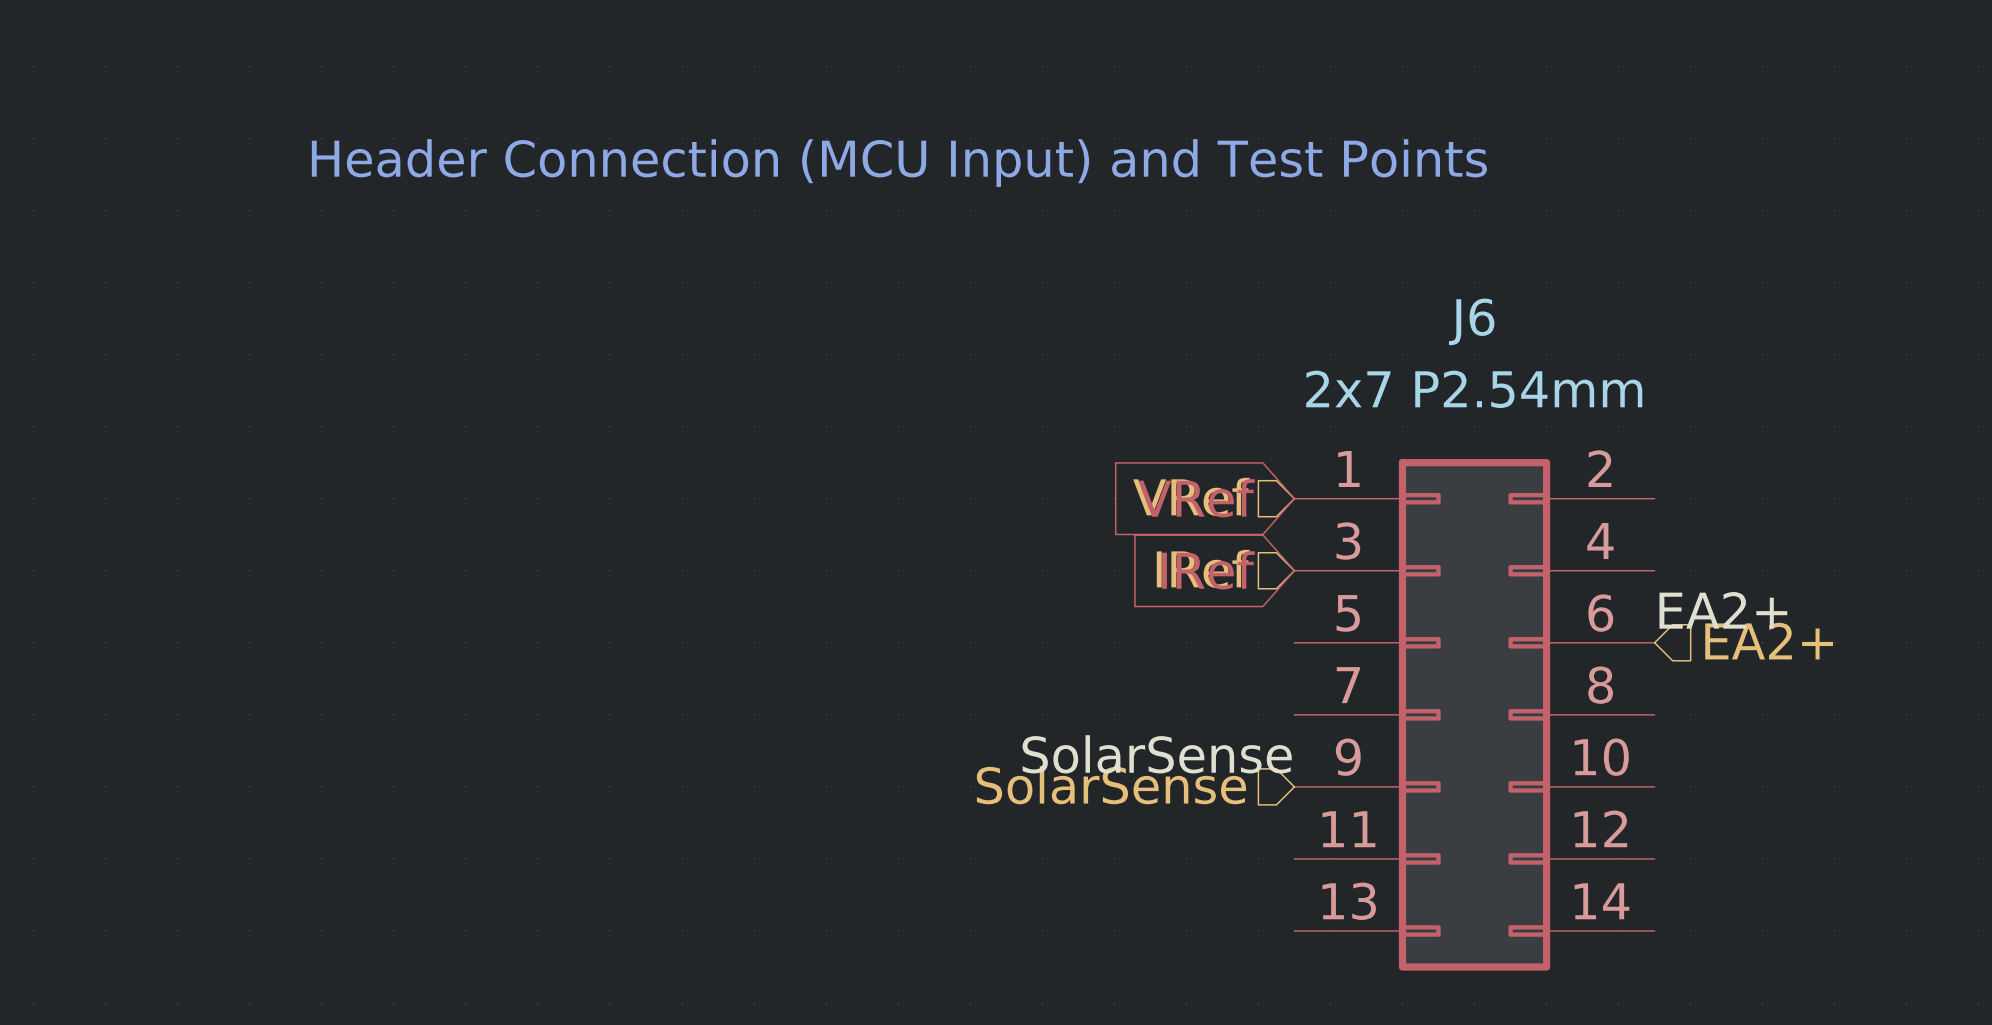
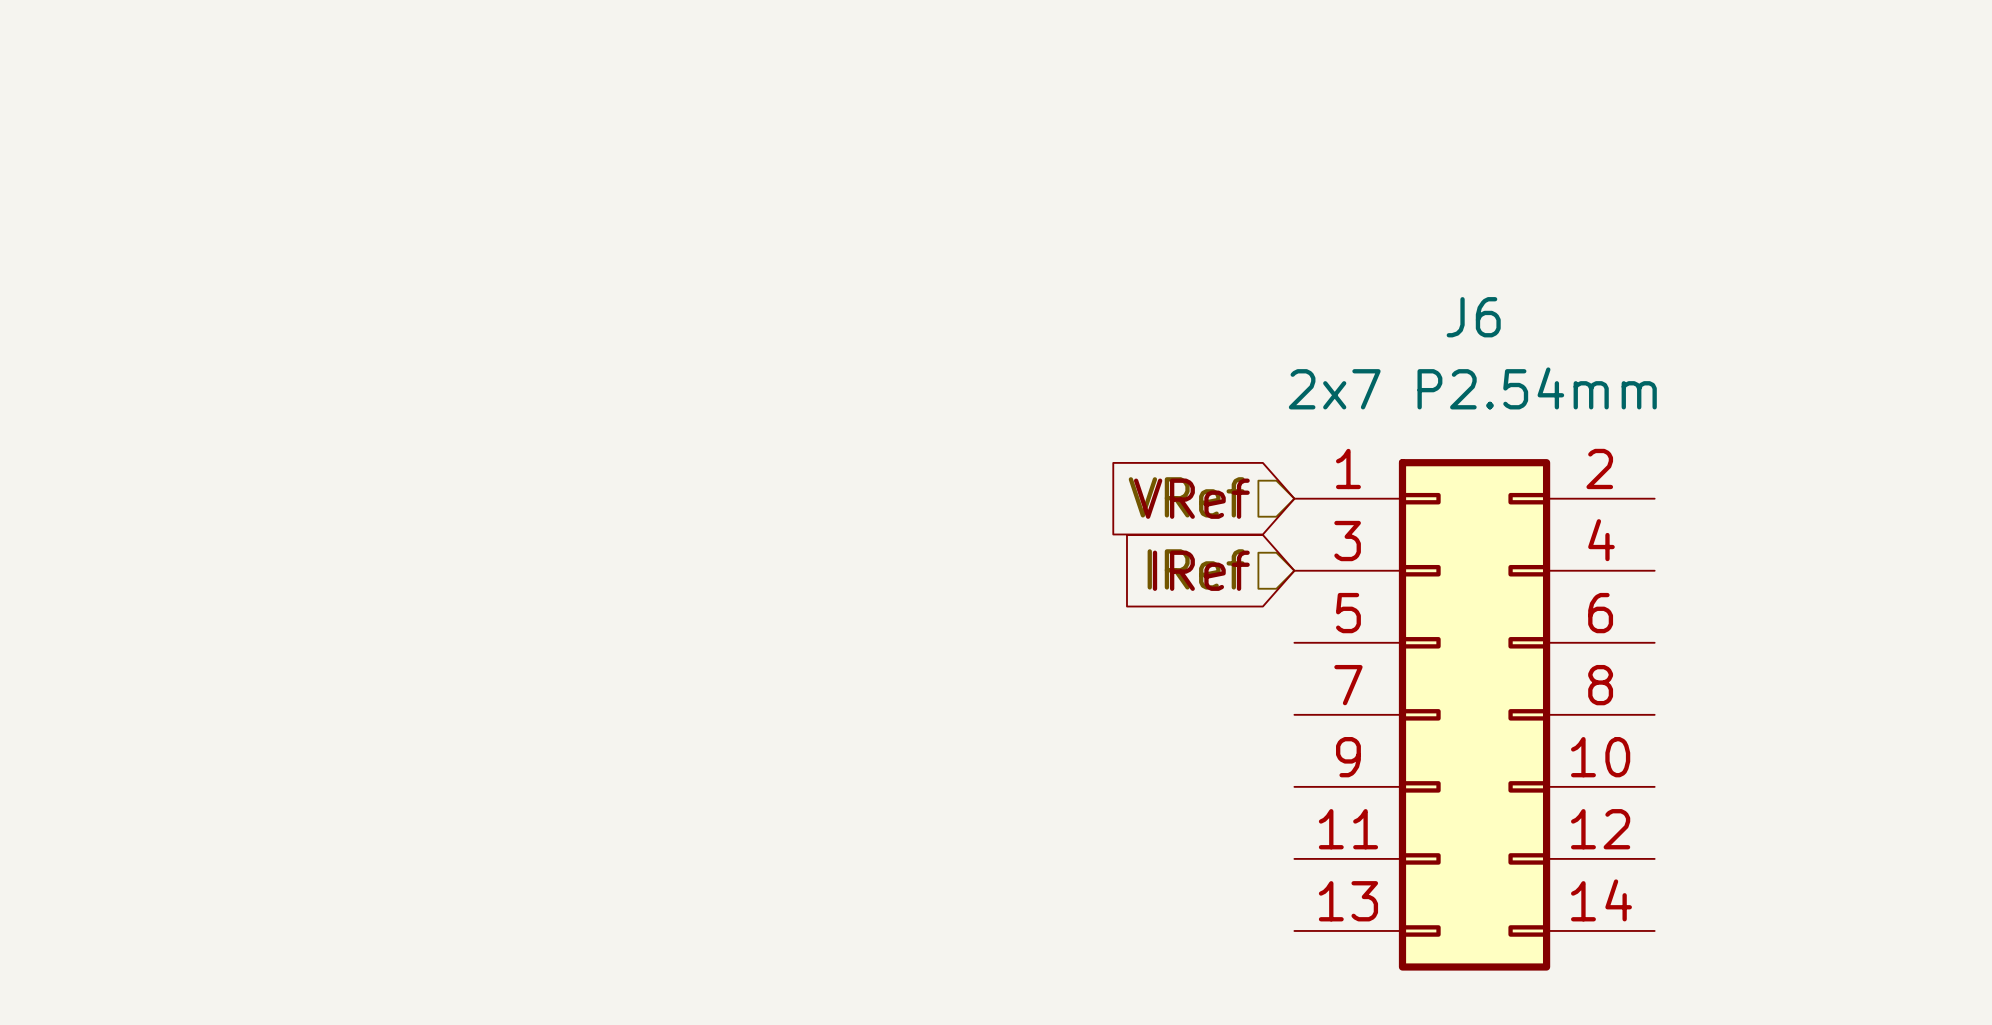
text: Header Connection (MCU Input) and Test Points (899, 163) -> none
label: EA2+ (1723, 610) -> none
hierarchical label: EA2+ (1769, 641) -> none
label: SolarSense (1157, 754) -> none
hierarchical label: SolarSense (1111, 785) -> none

